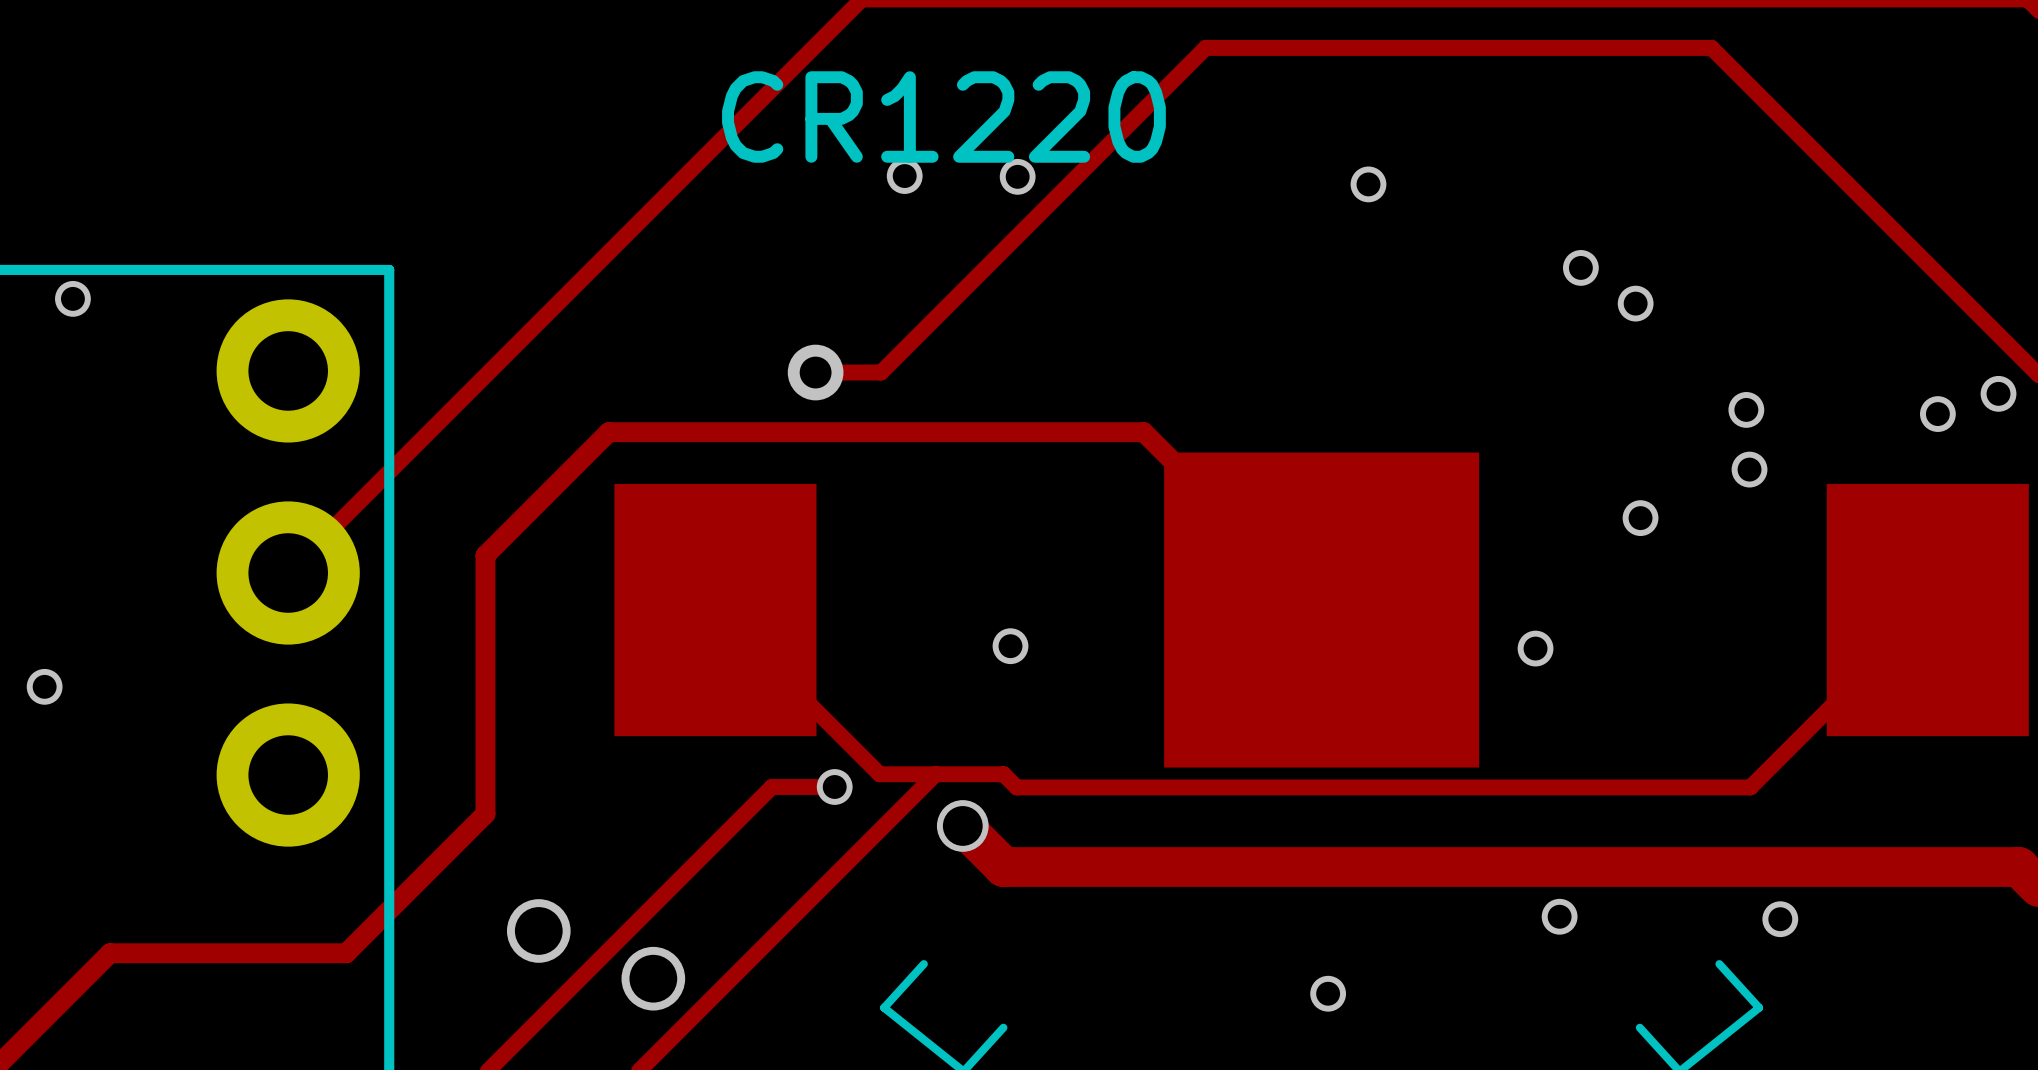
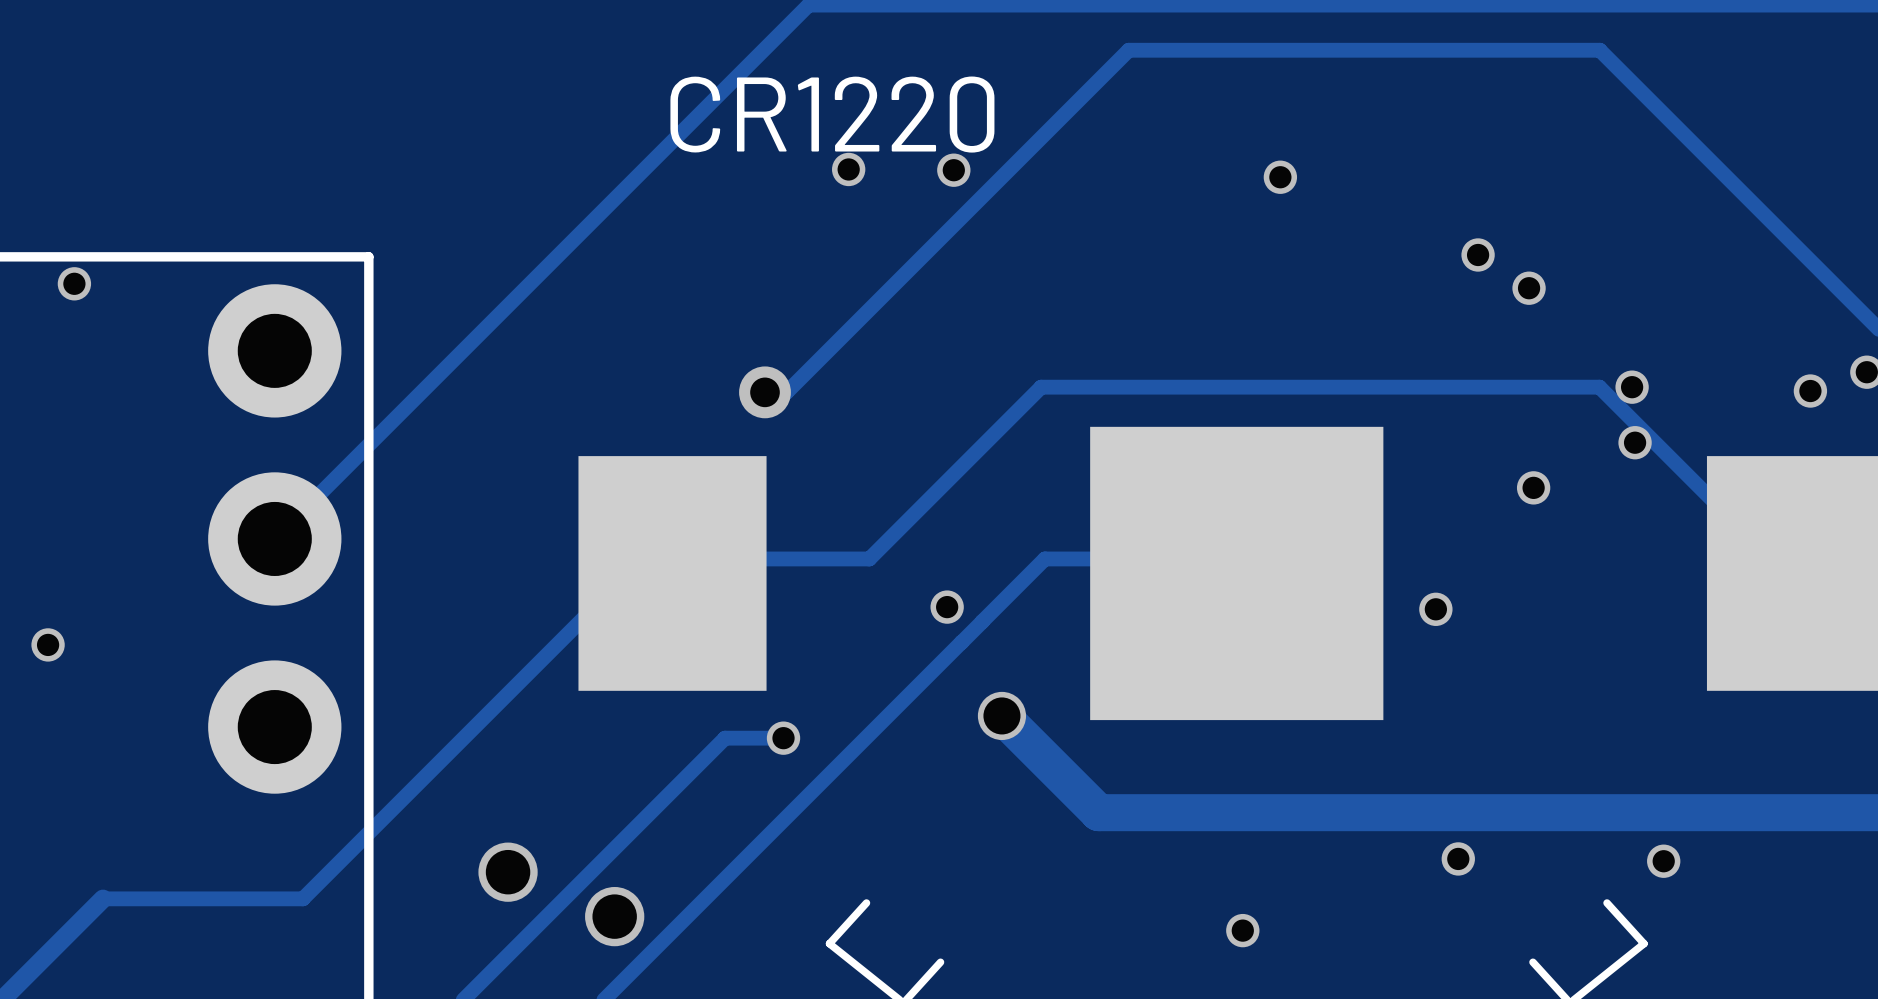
track: (815, 372) (881, 372) -> (764, 392) (786, 392) (826, 352)
via position: (815, 372) -> (764, 392)
track: none -> (1207, 558) (1044, 558) (877, 726)
track: (715, 610) (879, 774) (1003, 774) (1016, 787) (1750, 787) (1927, 610) -> none
track: (1321, 610) (1143, 432) (608, 432) (485, 555) (485, 814) (346, 953) (110, 953) (103, 959) -> (1771, 558) (1599, 387) (1041, 387) (869, 558) (642, 558) (302, 898) (103, 898)
track: (962, 825) (1003, 867) (1173, 867) -> (1001, 715) (1098, 812)
via position: (962, 825) -> (1001, 715)

